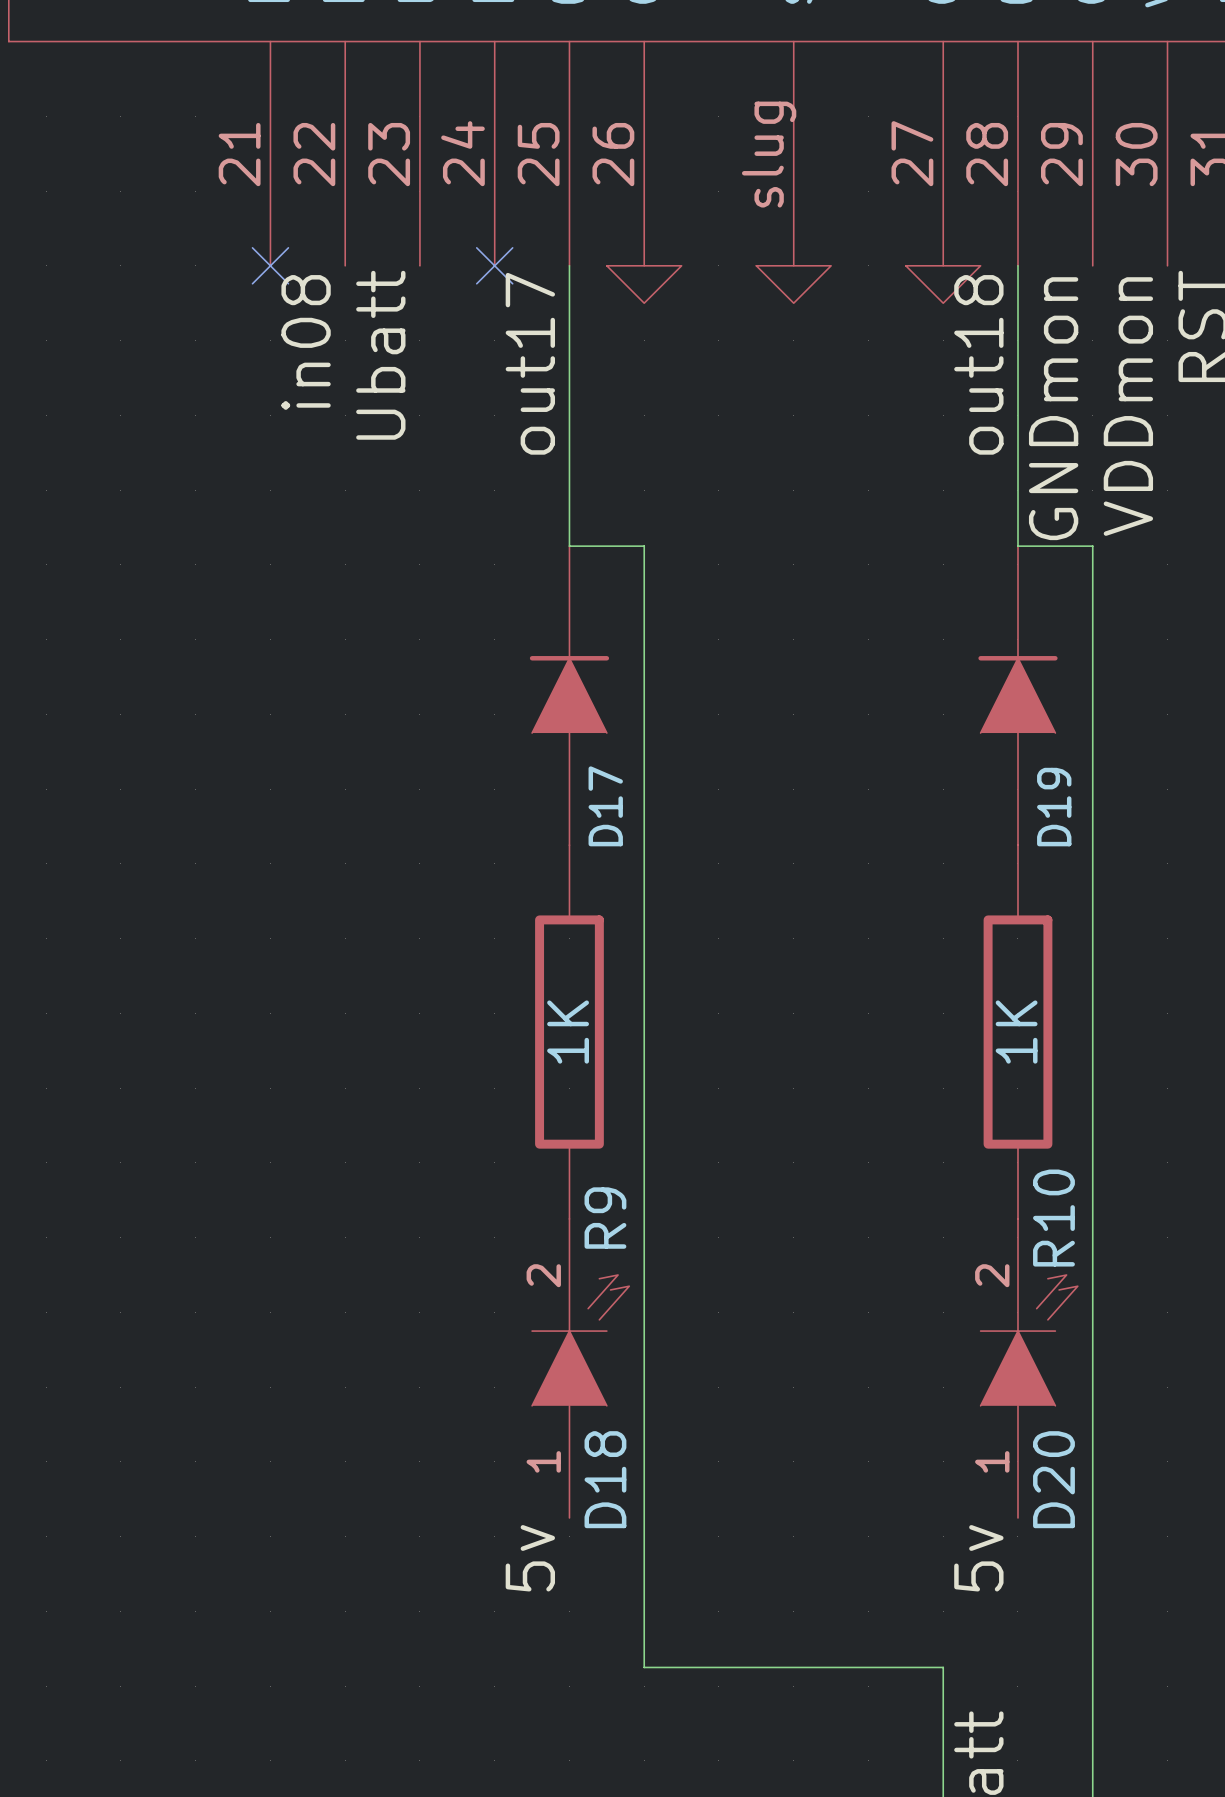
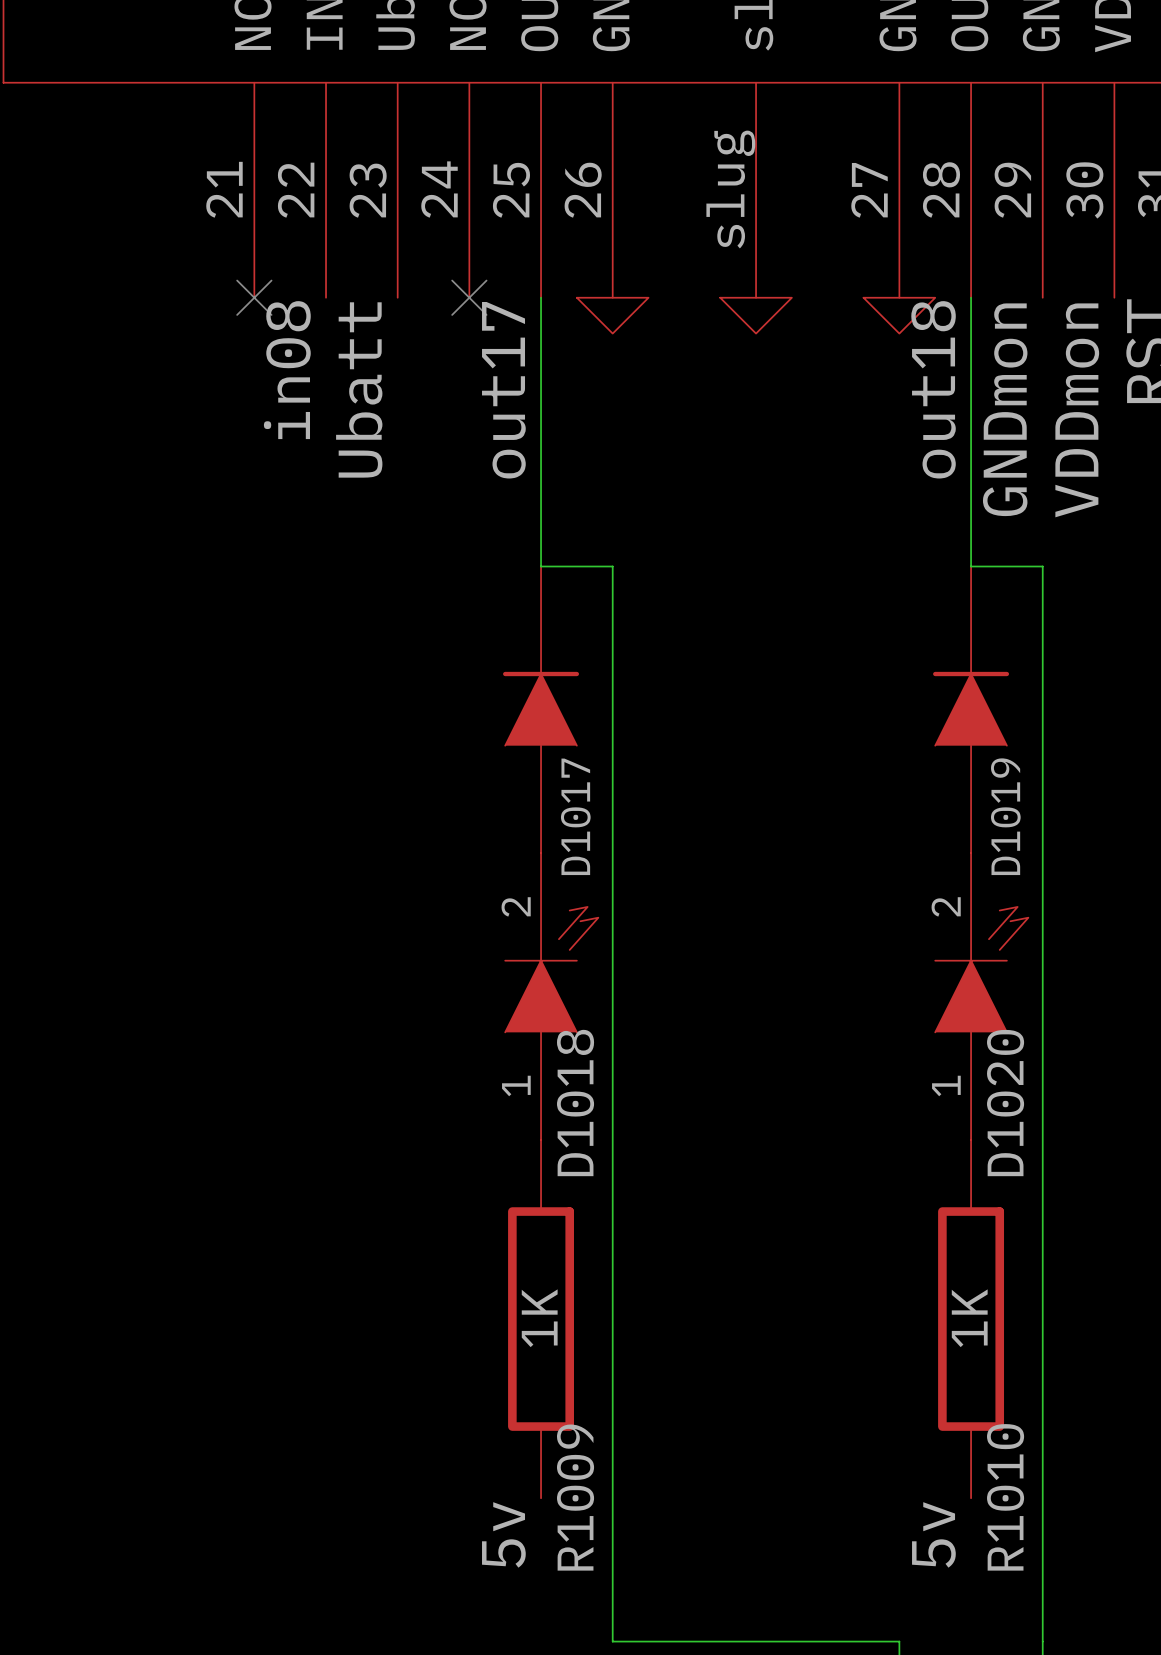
D17 name: D17 (605, 806) -> D1017 (575, 816)
D19 name: D19 (1054, 807) -> D1019 (1005, 816)
D1018: none -> (551, 996)
D1020: none -> (981, 996)
R9: 1K (569, 1032) -> none
R10: 1K (1017, 1032) -> none
R1009: none -> 1K (541, 1319)
R1010: none -> 1K (971, 1319)
D18: (580, 1368) -> none
D20: (1029, 1368) -> none

